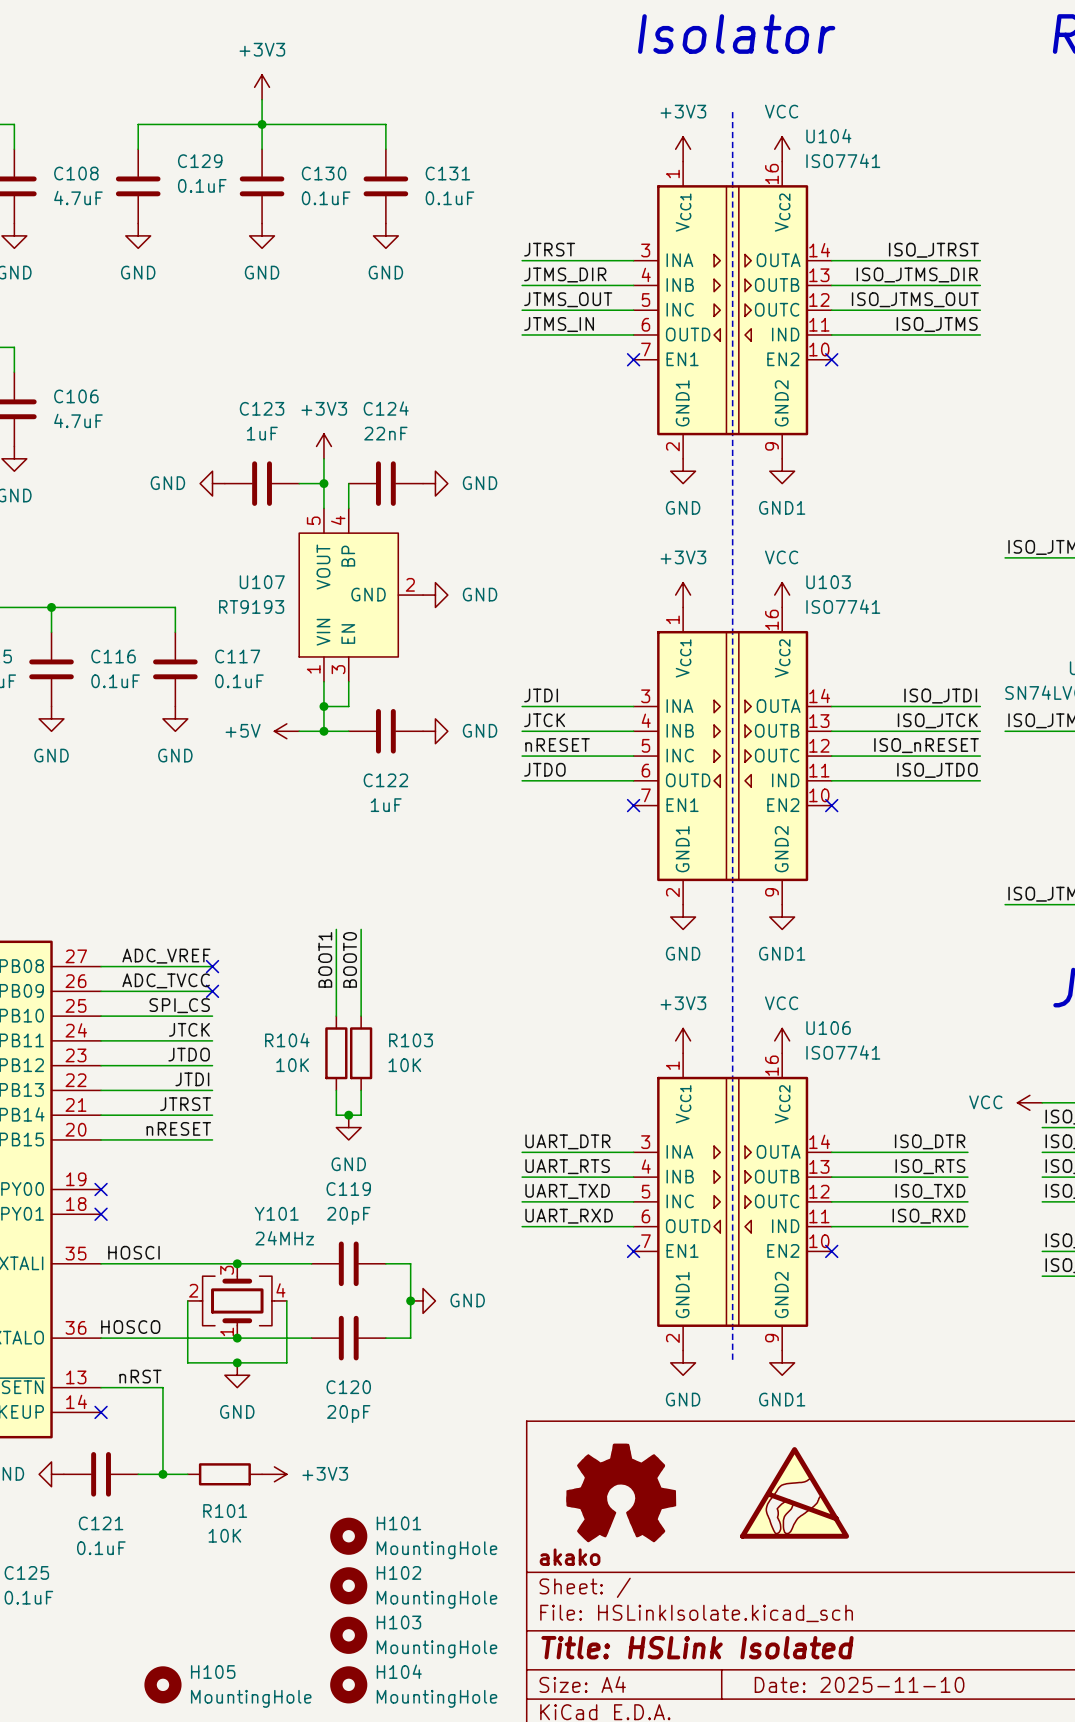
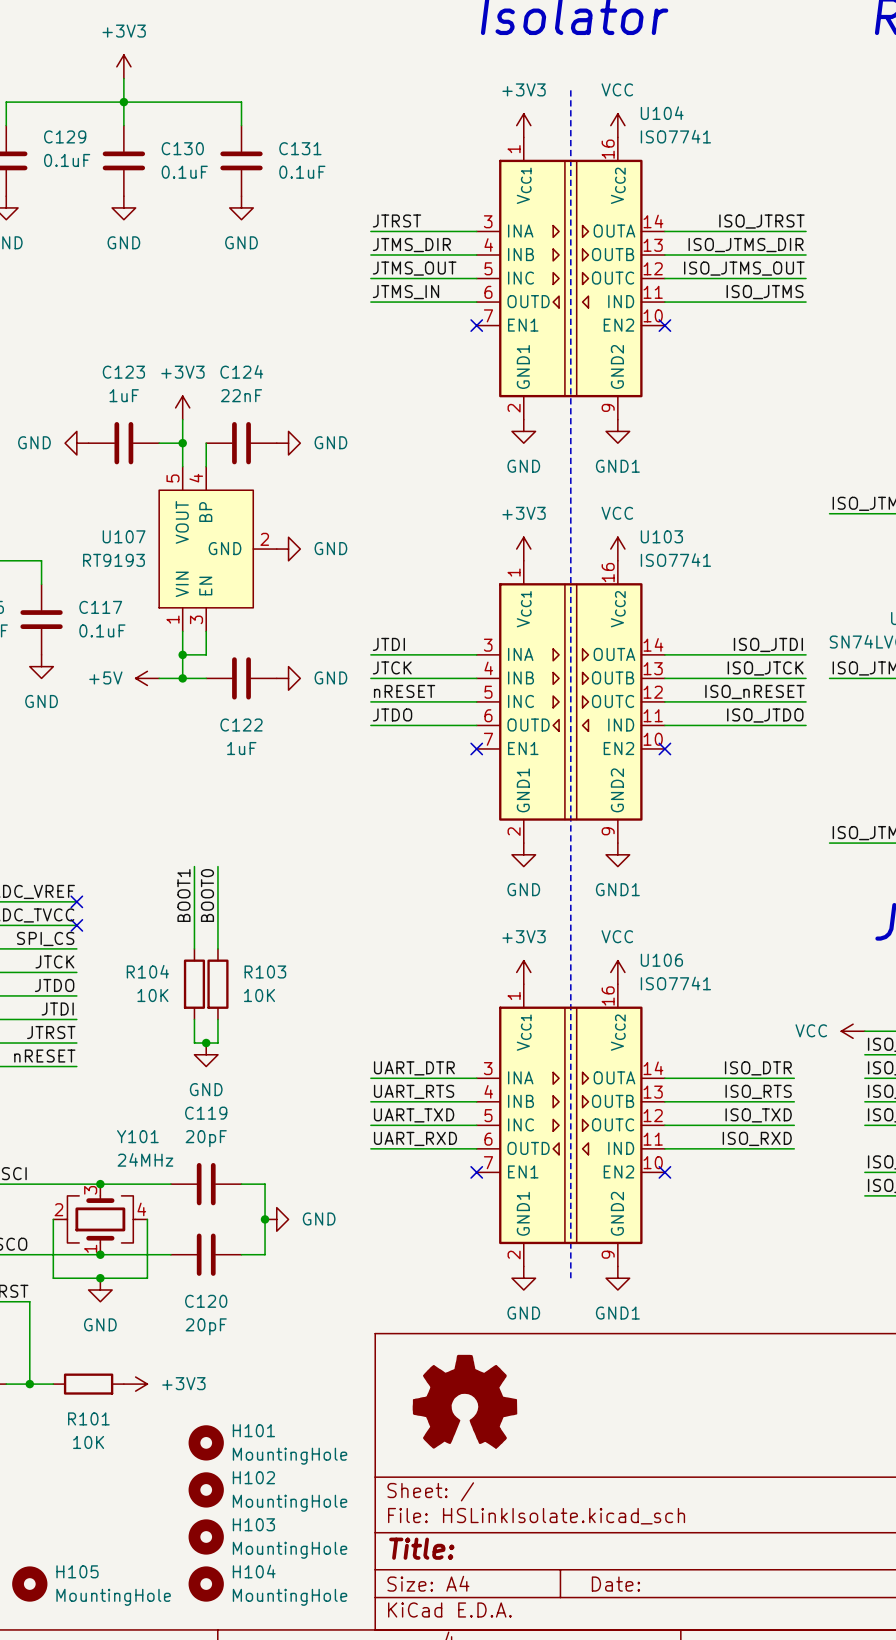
power symbol: (794, 1492) -> none
title block: akako (570, 1557) -> none
title block: Title: HSLink Isolated (697, 1647) -> Title: (421, 1548)
title block: Date: 2025-11-10 (859, 1684) -> Date: (615, 1584)

